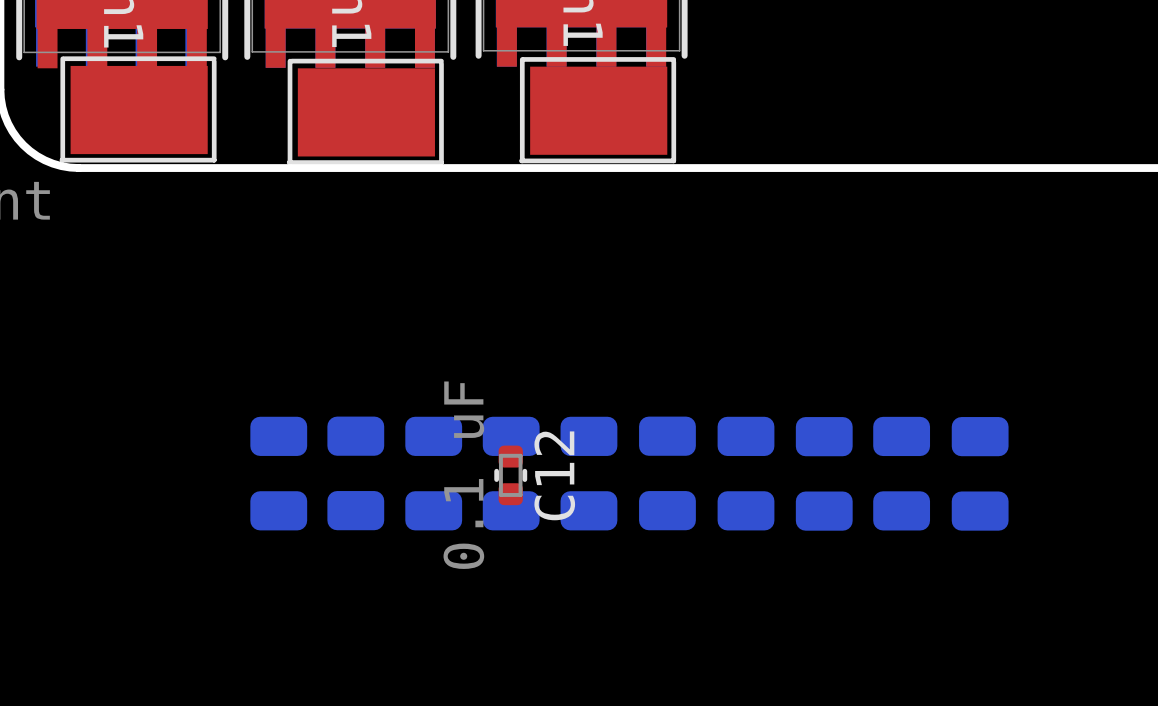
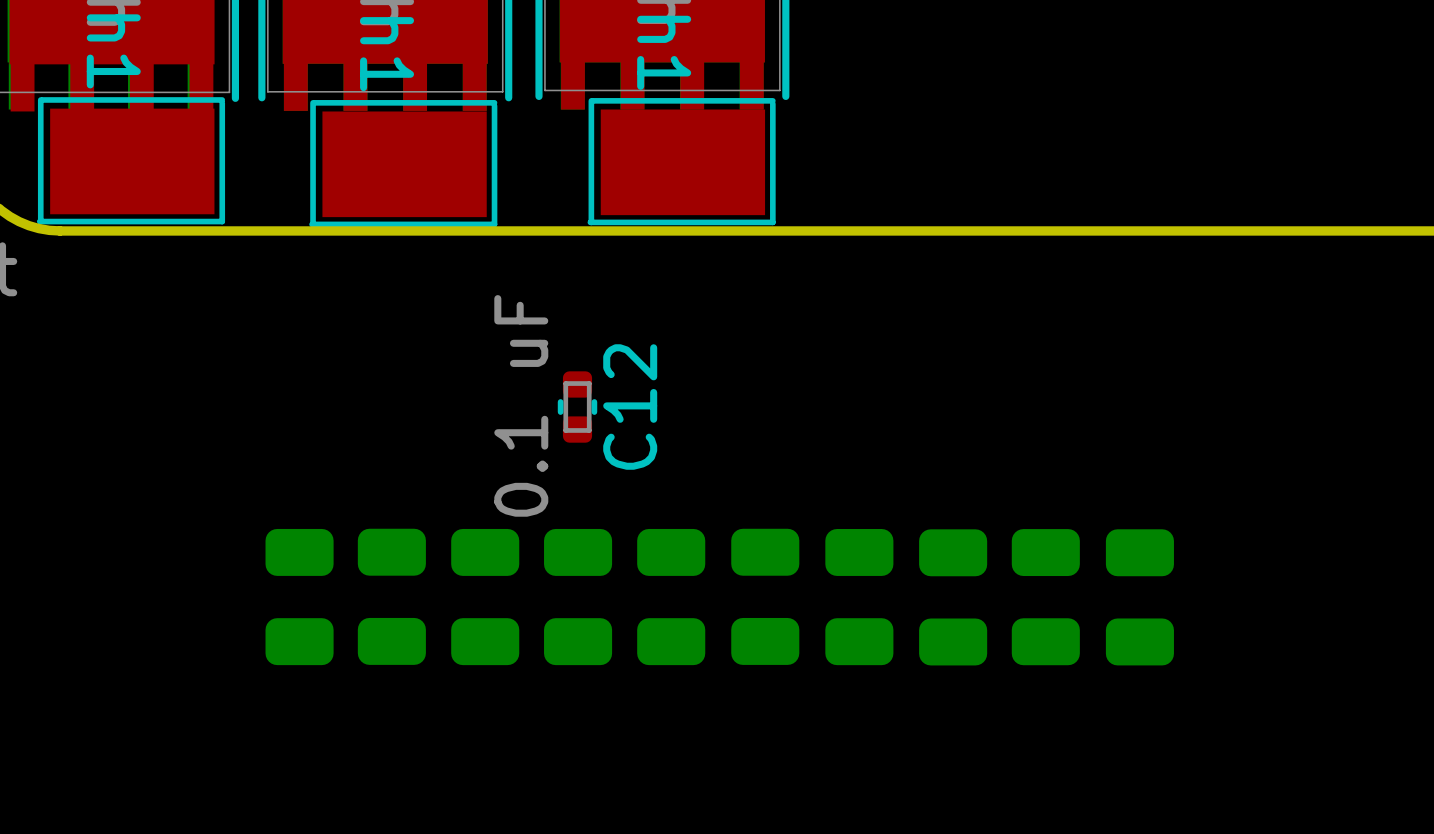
C12 position: (510, 475) -> (577, 407)

